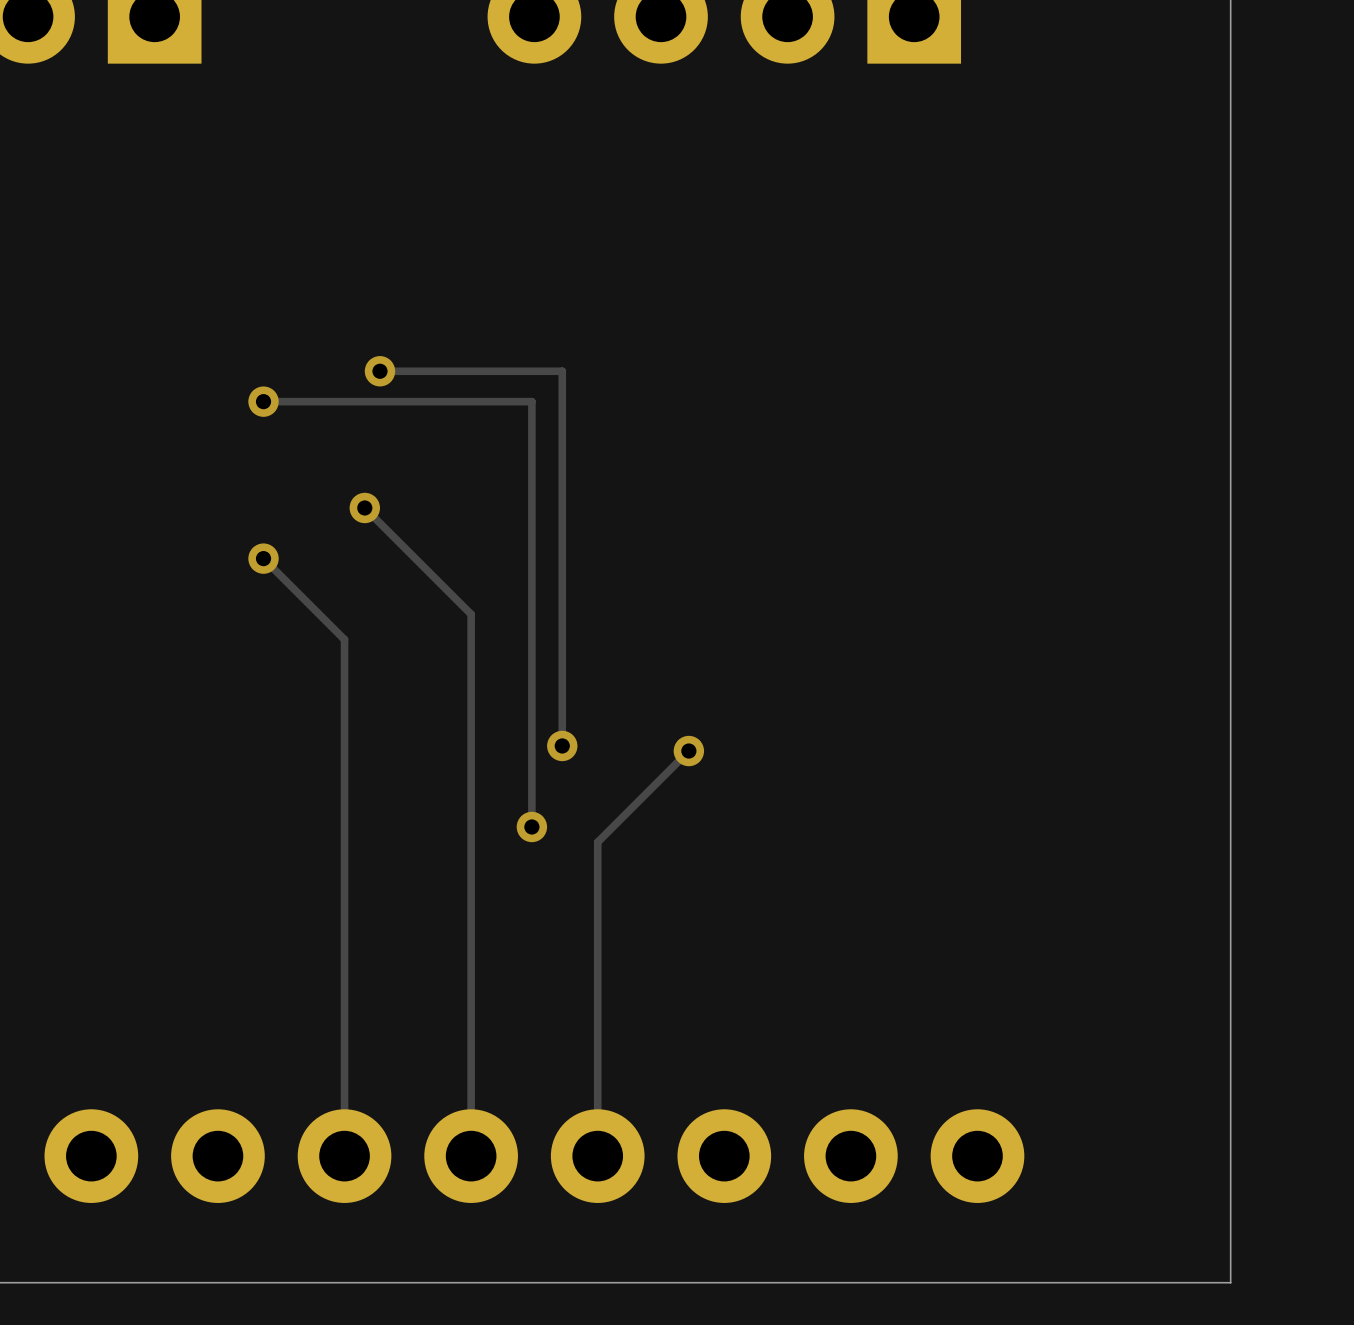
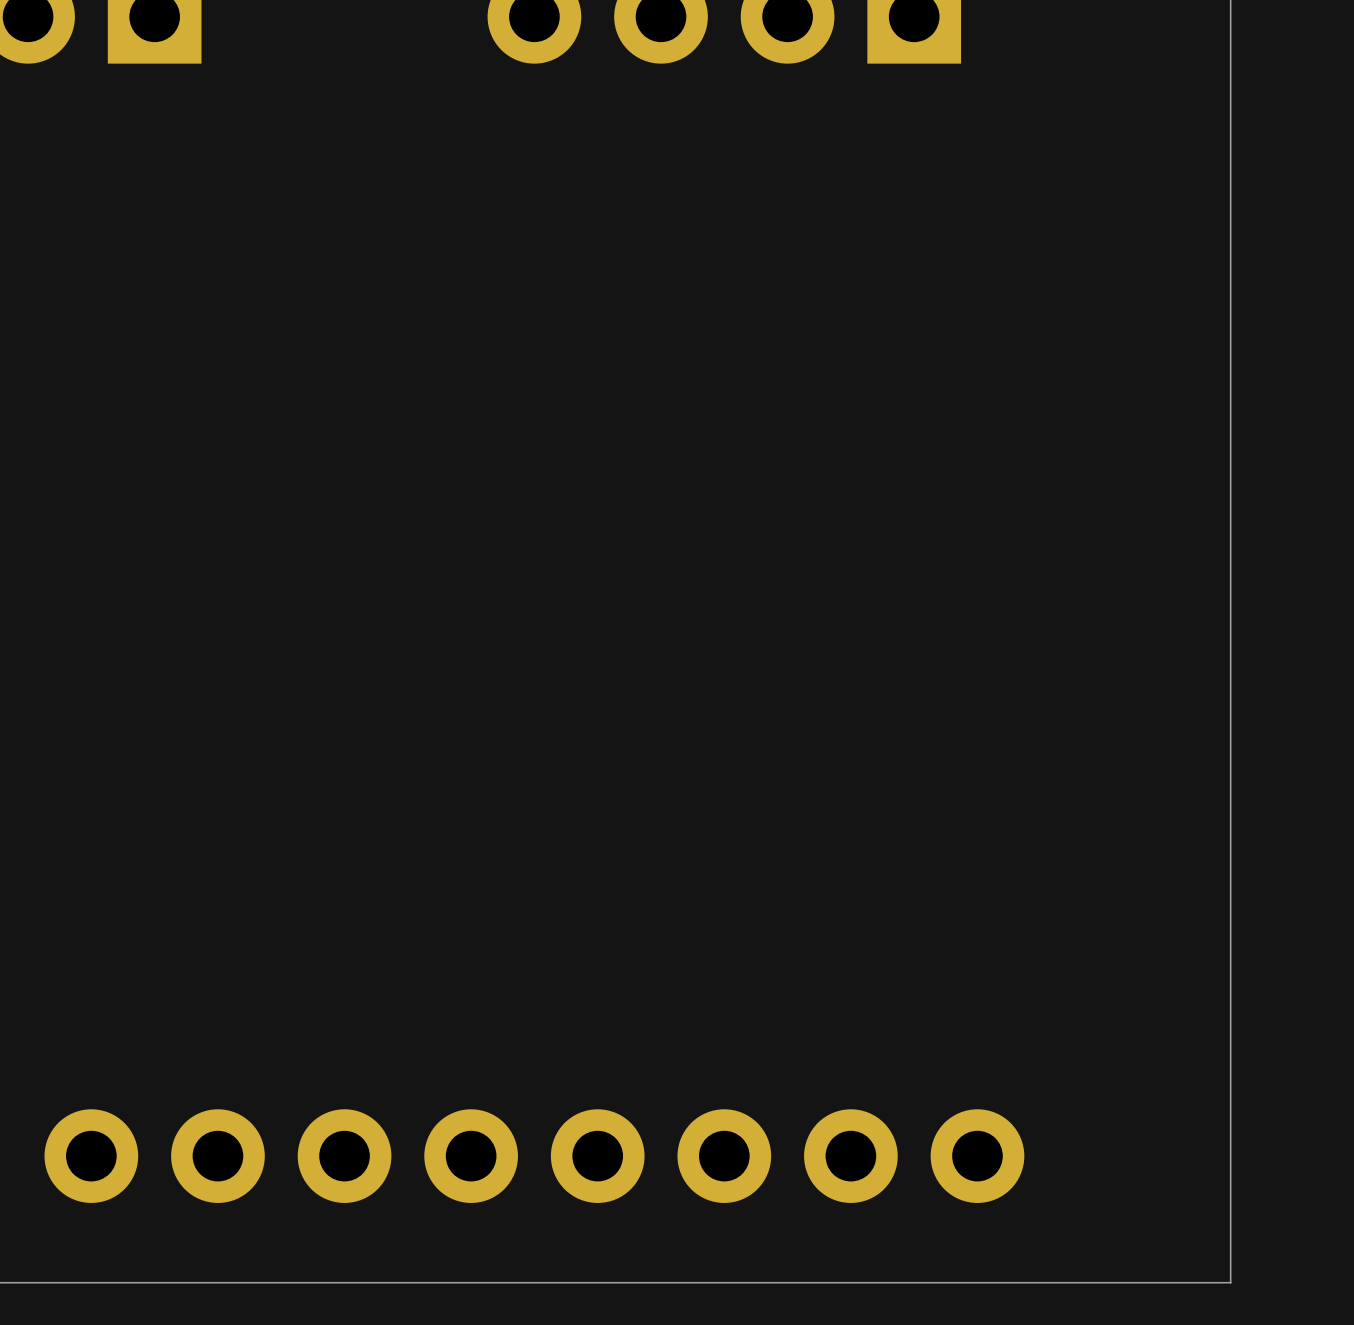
track: (379, 371) (562, 371) (562, 745) -> none
via: (379, 371) -> none
track: (263, 401) (531, 401) (531, 826) -> none
via: (263, 401) -> none
track: (364, 507) (471, 614) (471, 1156) -> none
via: (364, 507) -> none
track: (263, 558) (344, 639) (344, 1156) -> none
via: (263, 558) -> none
via: (562, 745) -> none
track: (688, 751) (597, 842) (597, 1156) -> none
via: (688, 751) -> none
via: (531, 826) -> none

